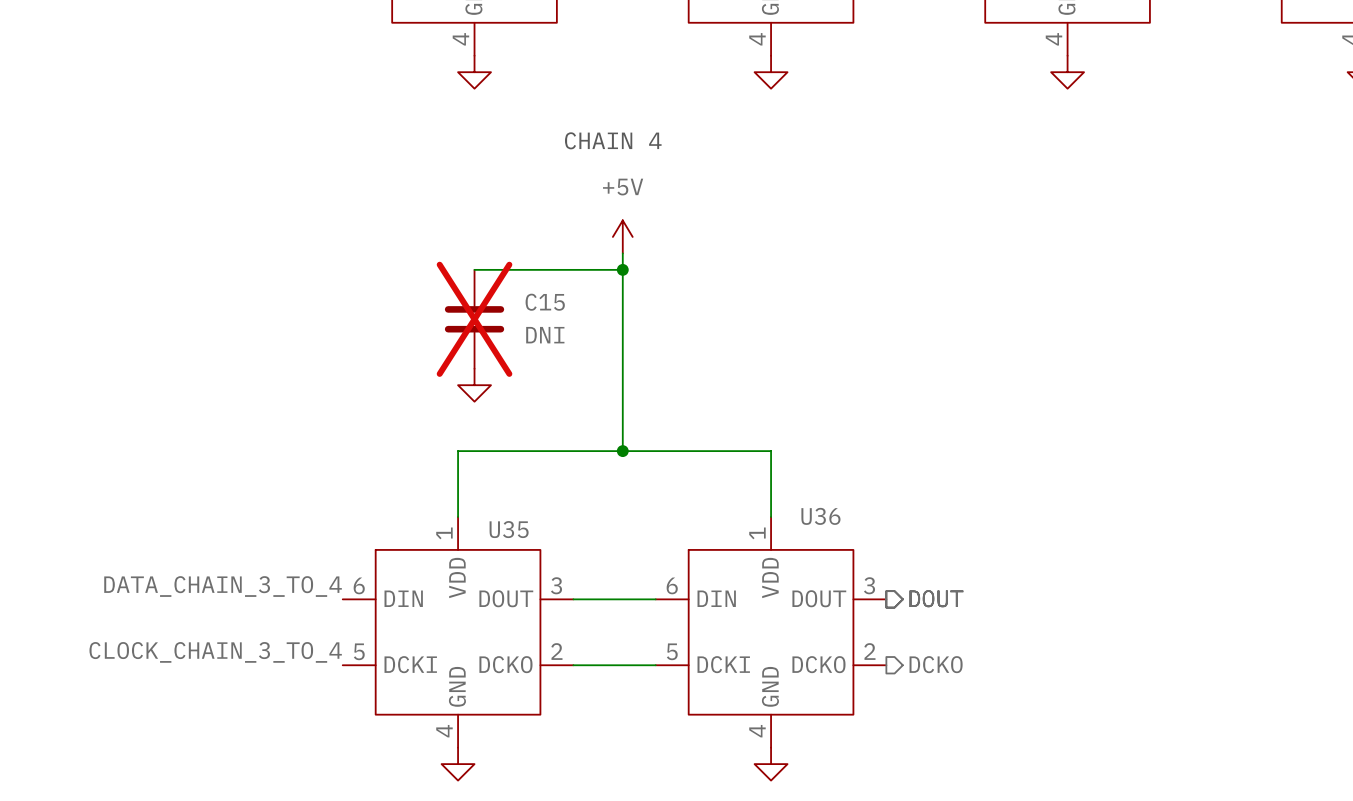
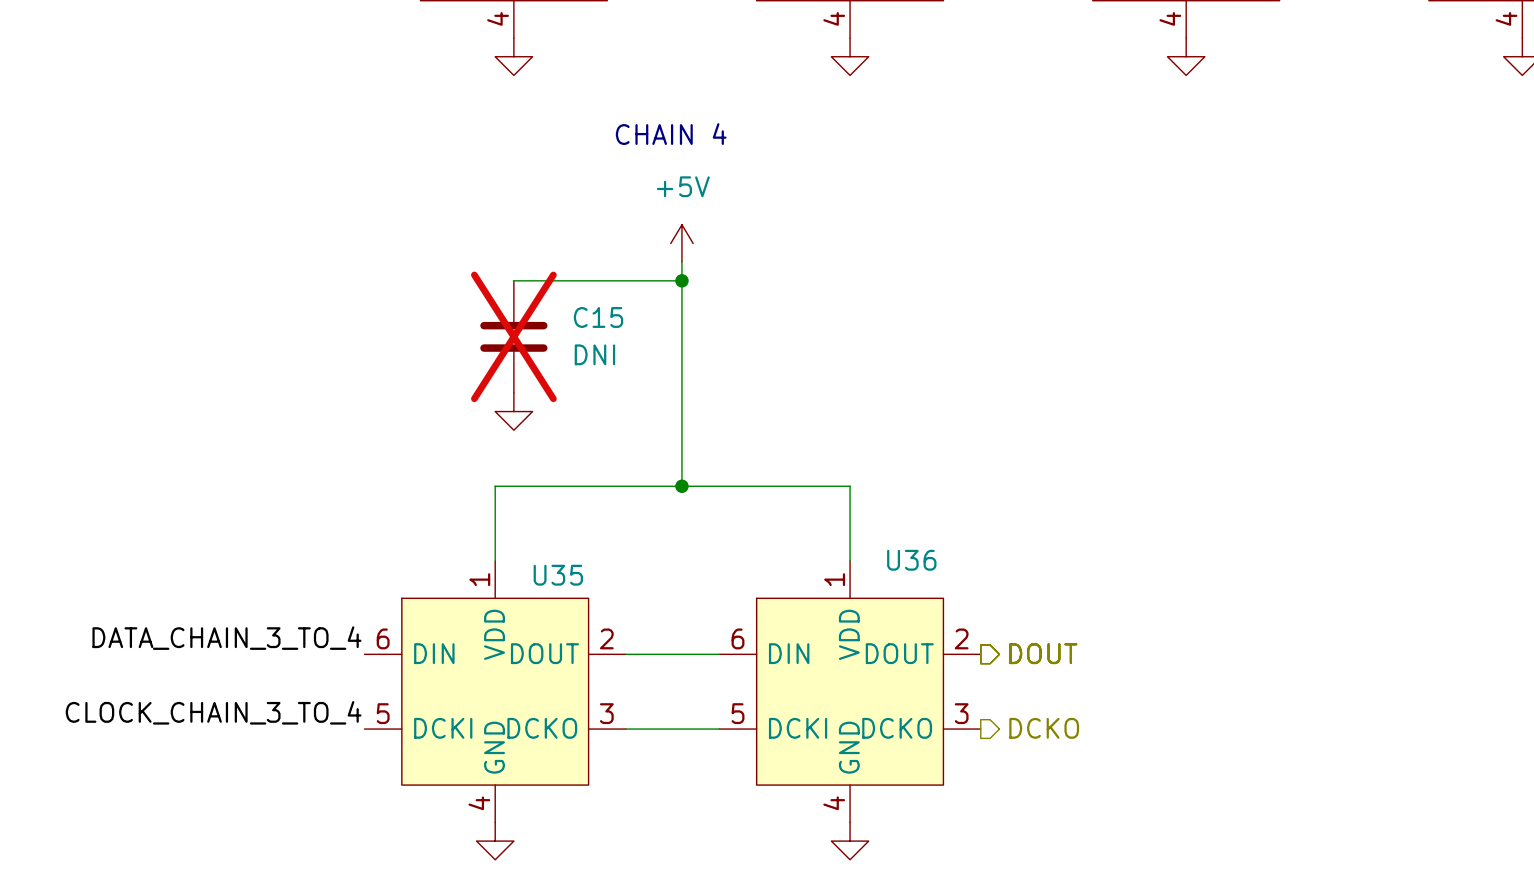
U35 pin number: 3 (556, 585) -> 2 (606, 638)
U36 pin number: 3 (869, 585) -> 2 (961, 638)
U35 pin number: 2 (556, 651) -> 3 (606, 713)
U36 pin number: 2 (869, 651) -> 3 (961, 713)

